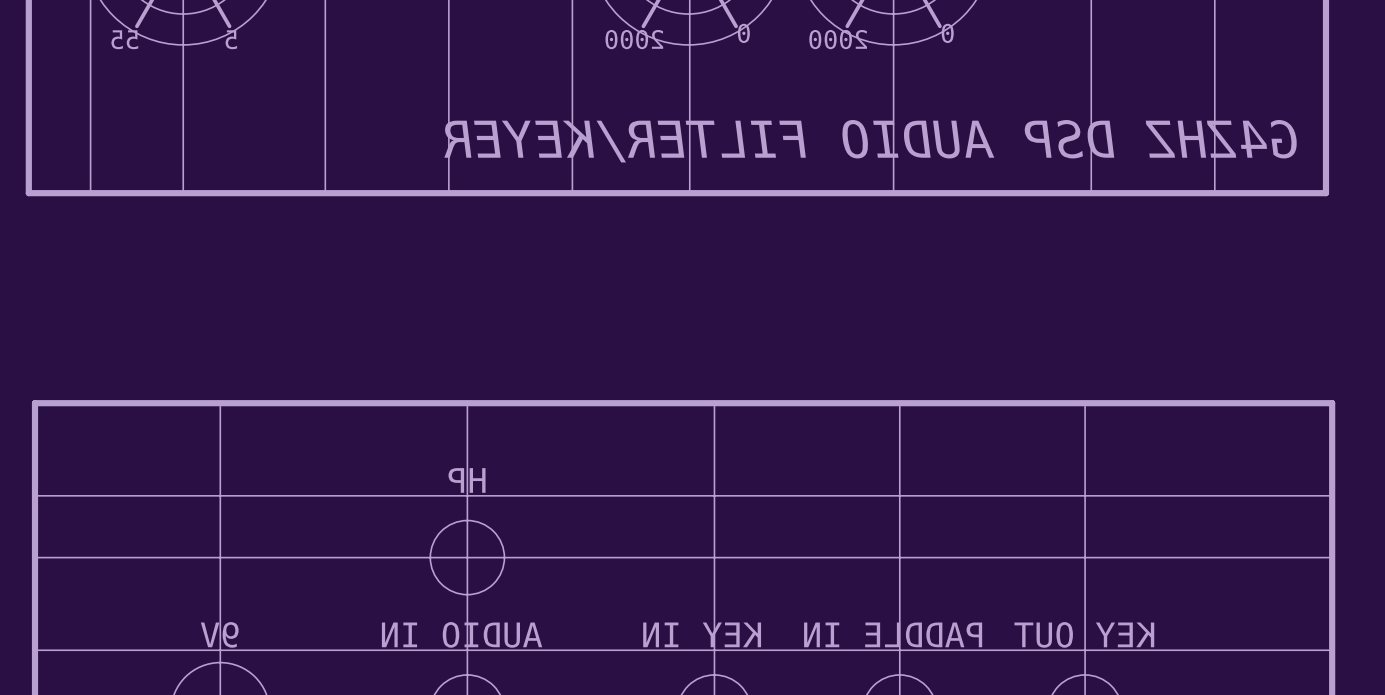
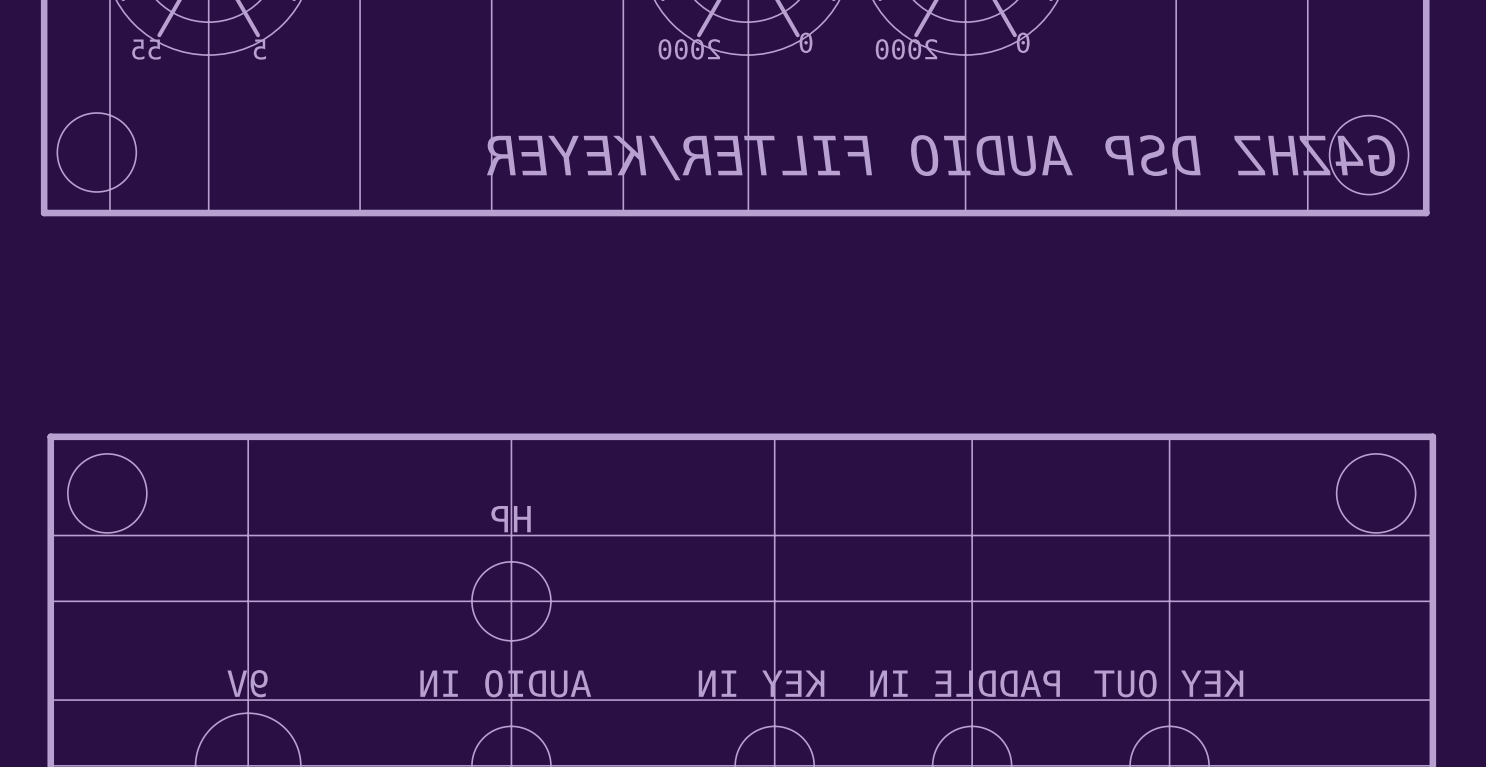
drawing: none -> [56, 112, 137, 193]
drawing: none -> [1328, 114, 1410, 196]
drawing: none -> [67, 453, 148, 534]
drawing: none -> [1336, 453, 1417, 534]

